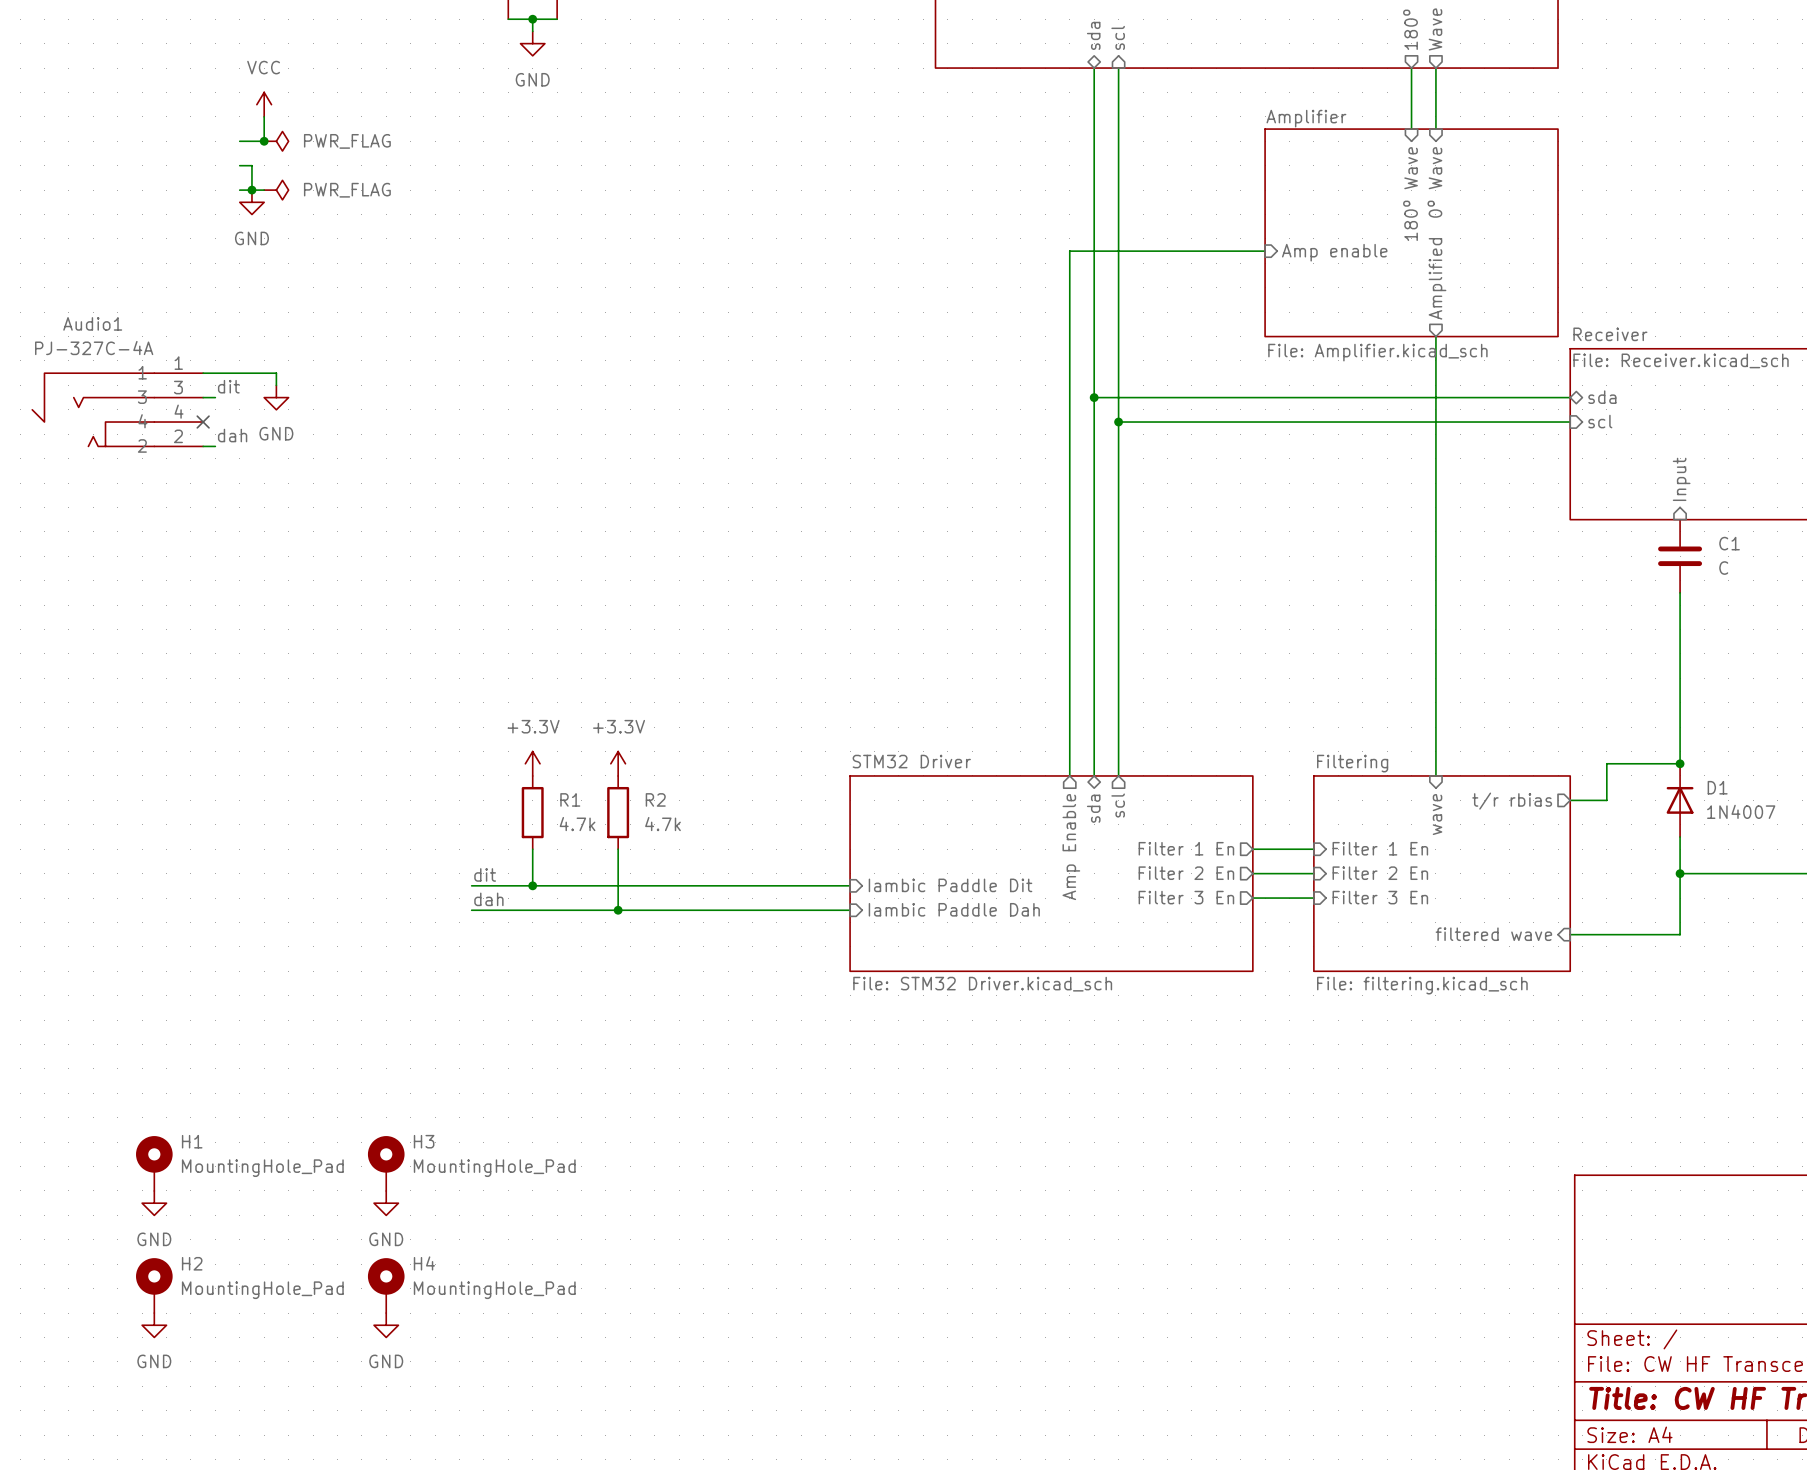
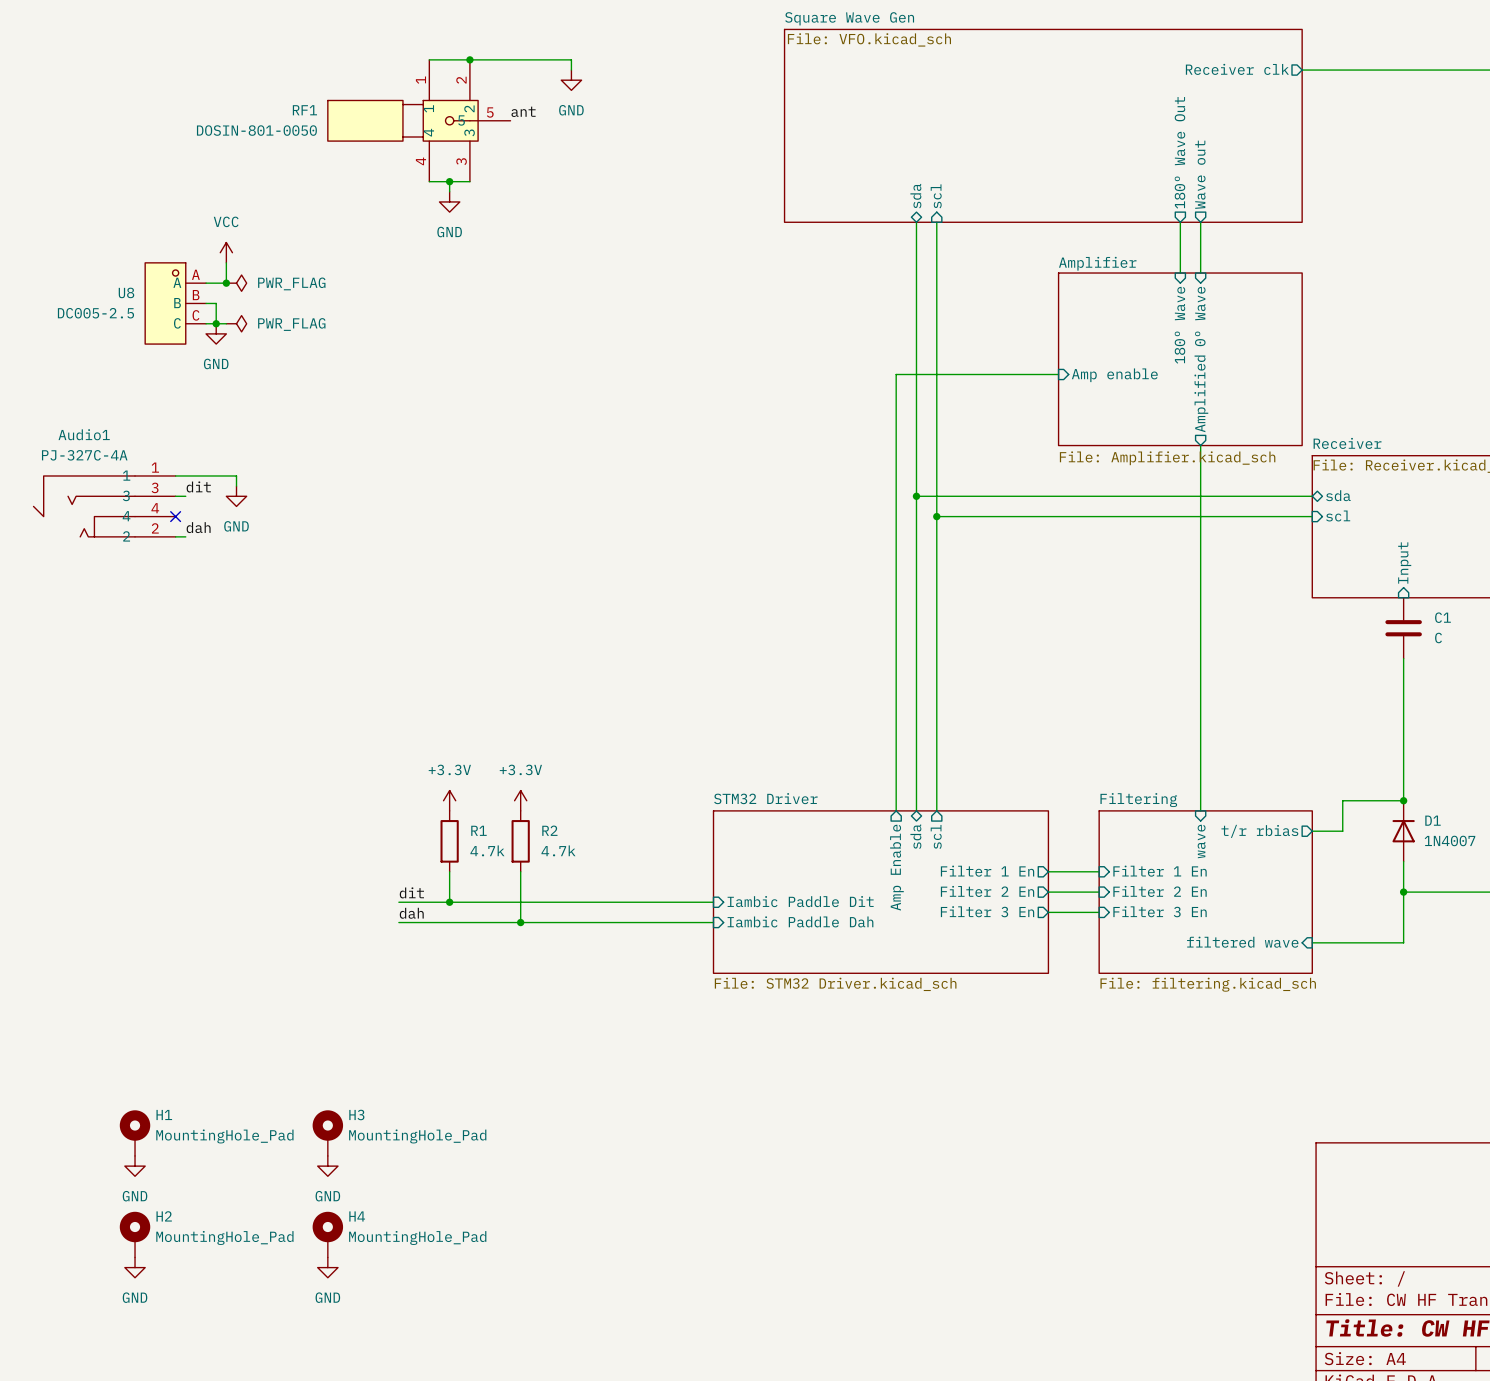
U8: none -> DC005-2.5 (175, 303)

